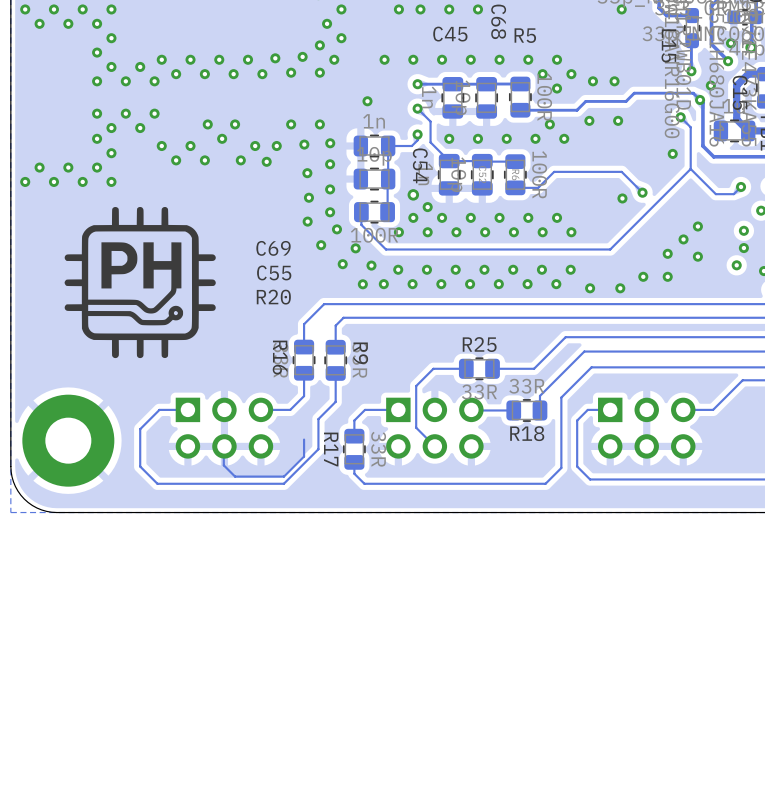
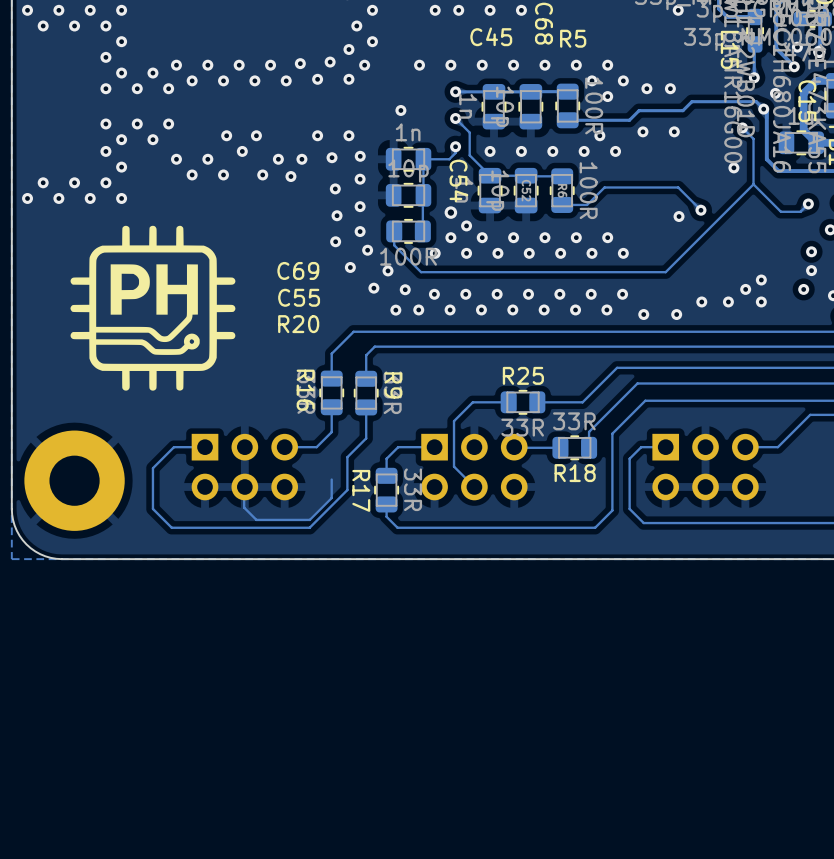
via: (697, 226) -> none
via: (683, 239) -> none
via: (667, 253) -> none
via: none -> (745, 289)
via: none -> (761, 301)

